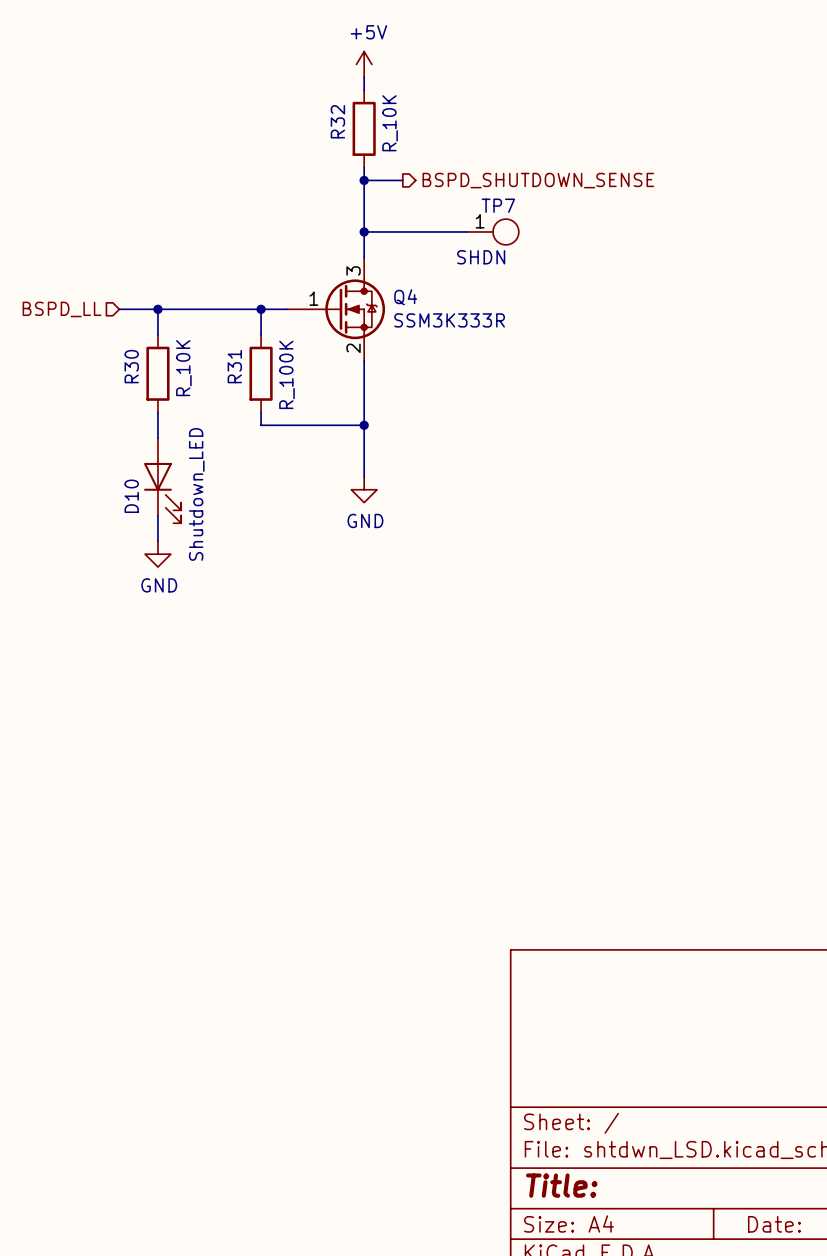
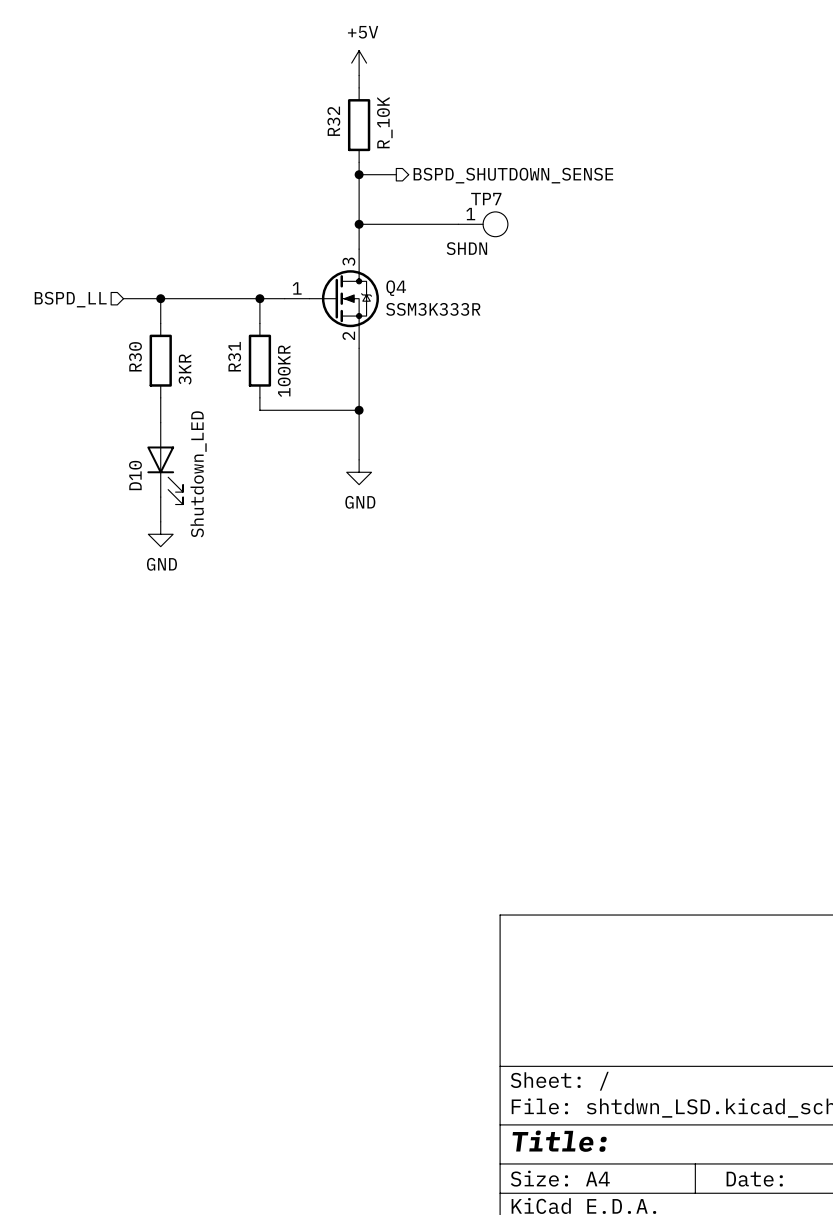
Q4 symbol: [286, 257, 386, 361] -> [284, 249, 379, 349]
R30 value: R_10K (183, 368) -> 3KR (185, 369)
R31 value: R_100K (286, 374) -> 100KR (284, 371)

